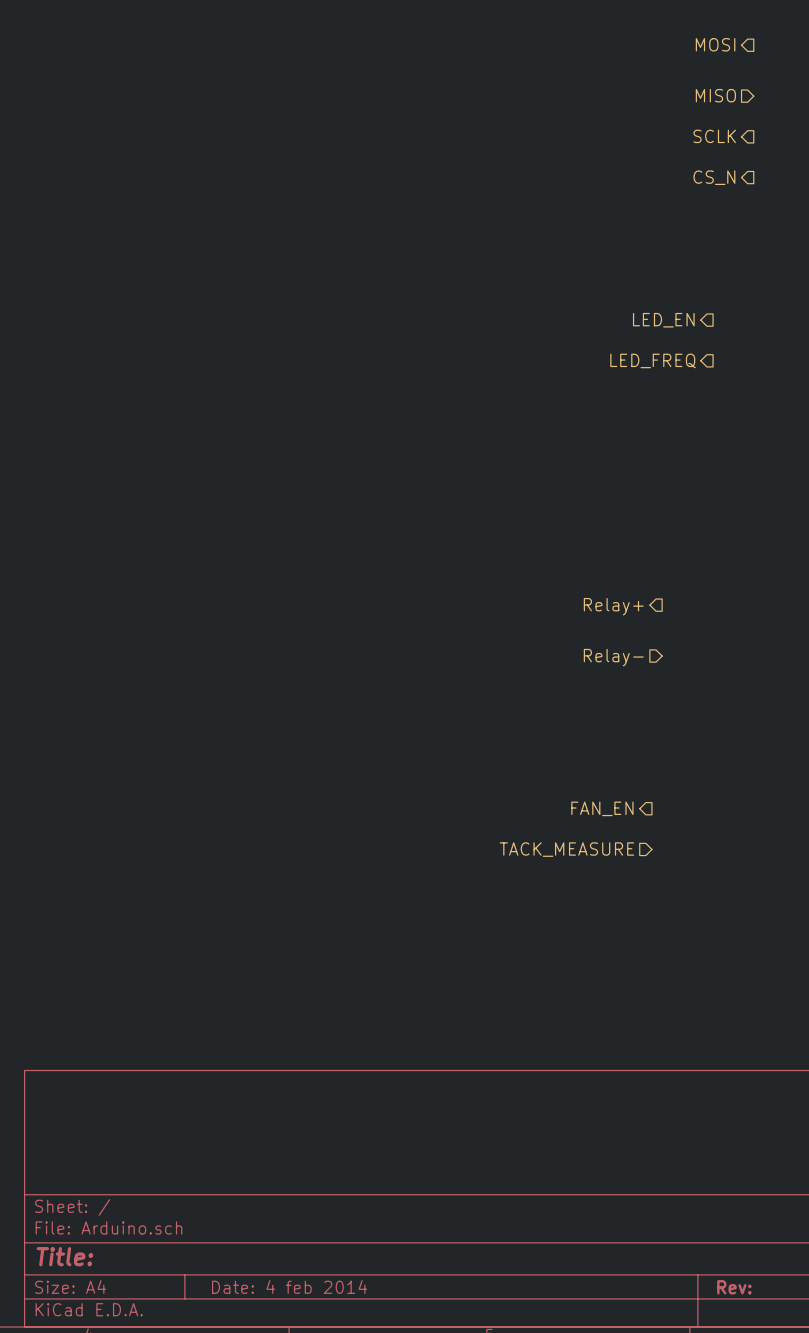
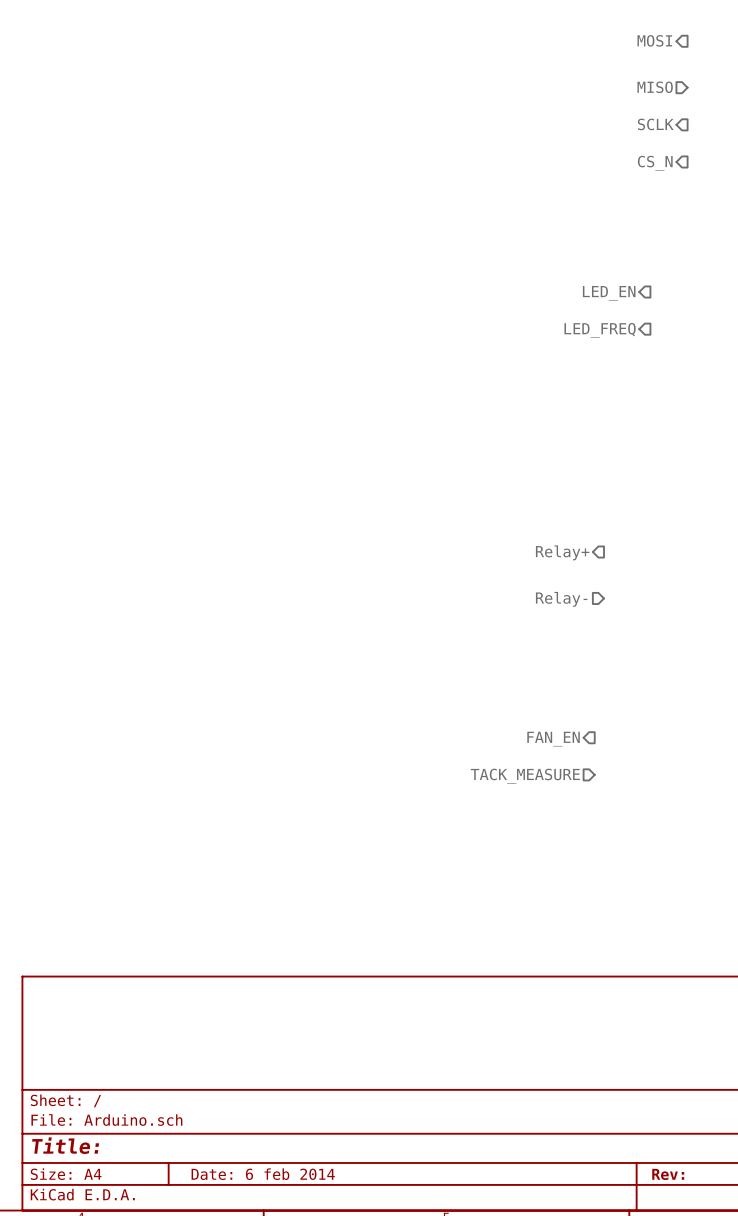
title block: Date: 4 feb 2014 (289, 1287) -> Date: 6 feb 2014 (263, 1174)

